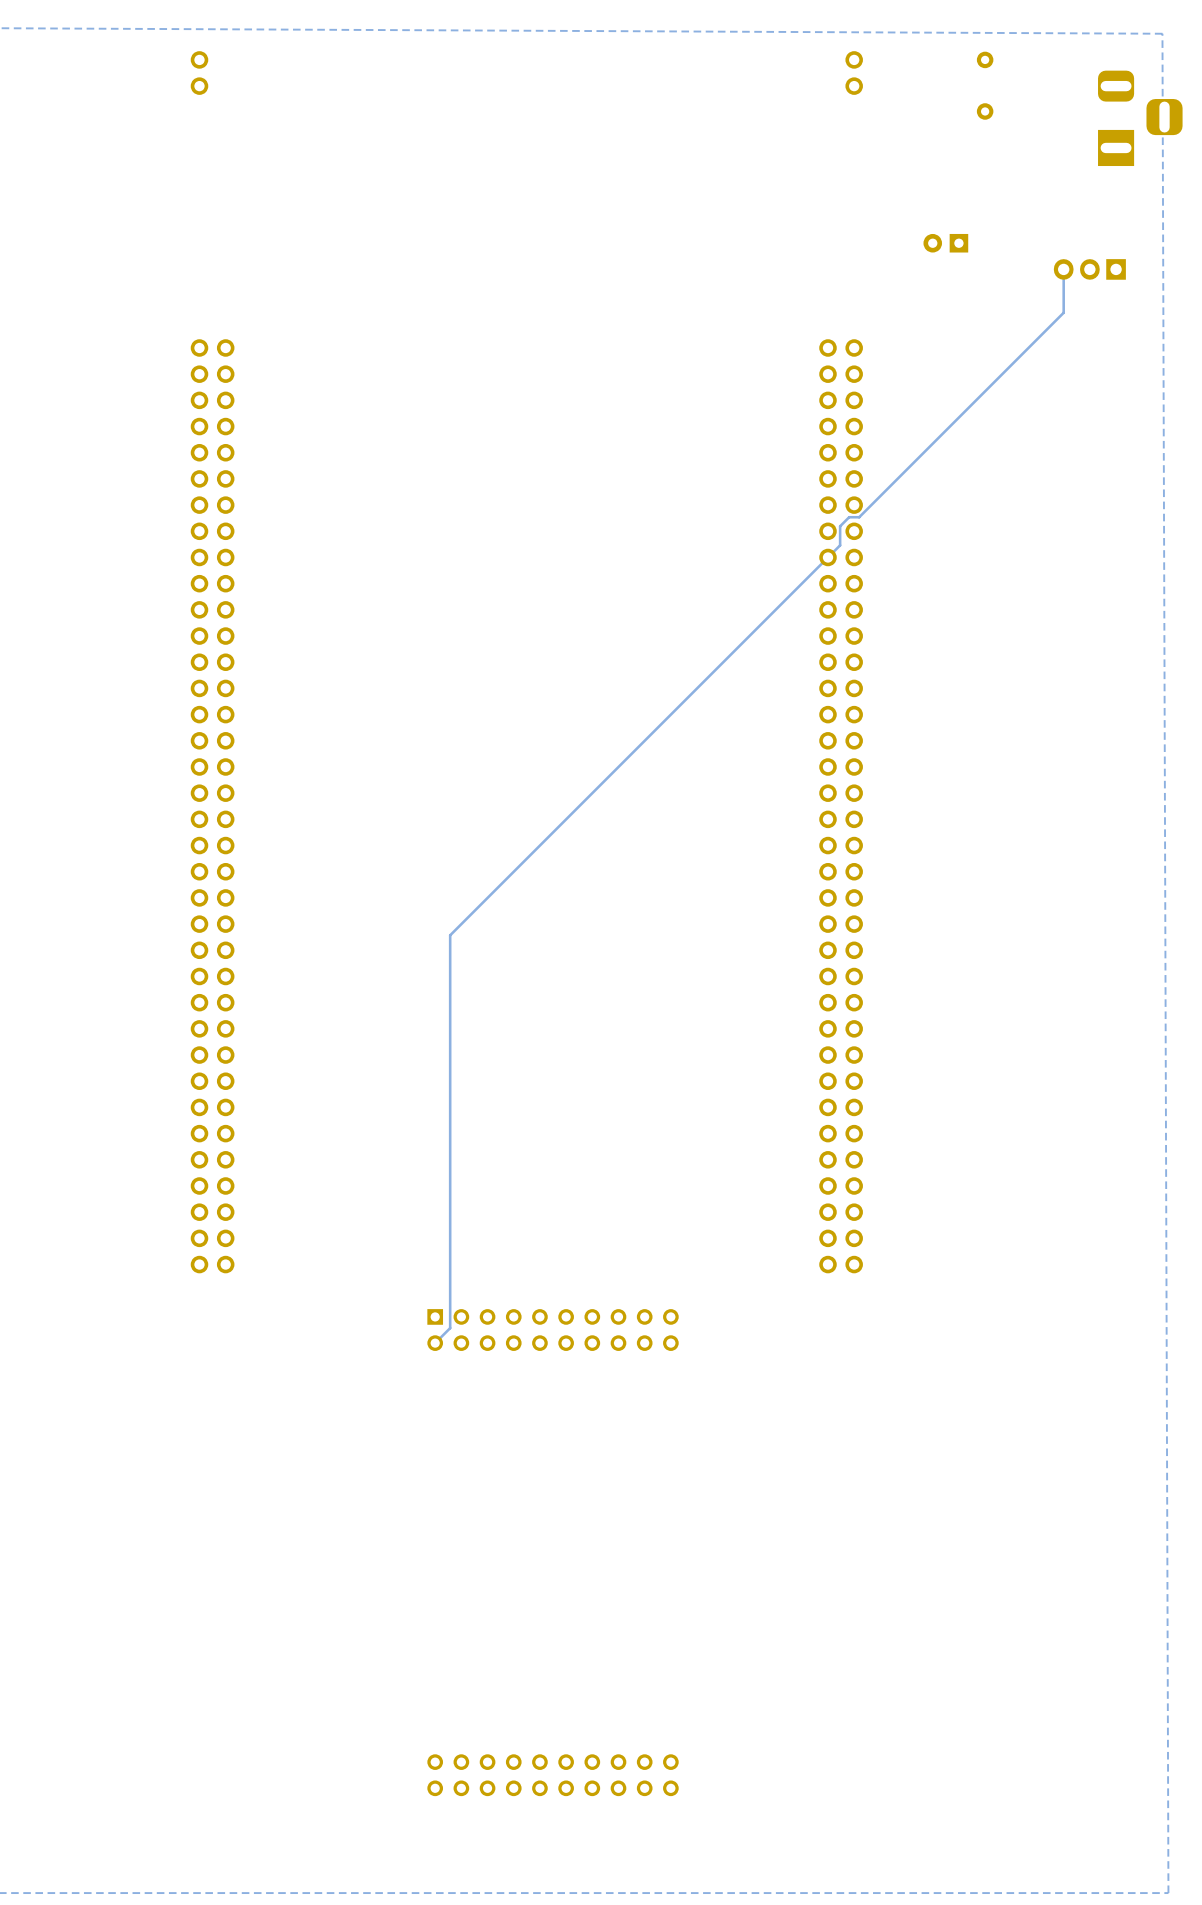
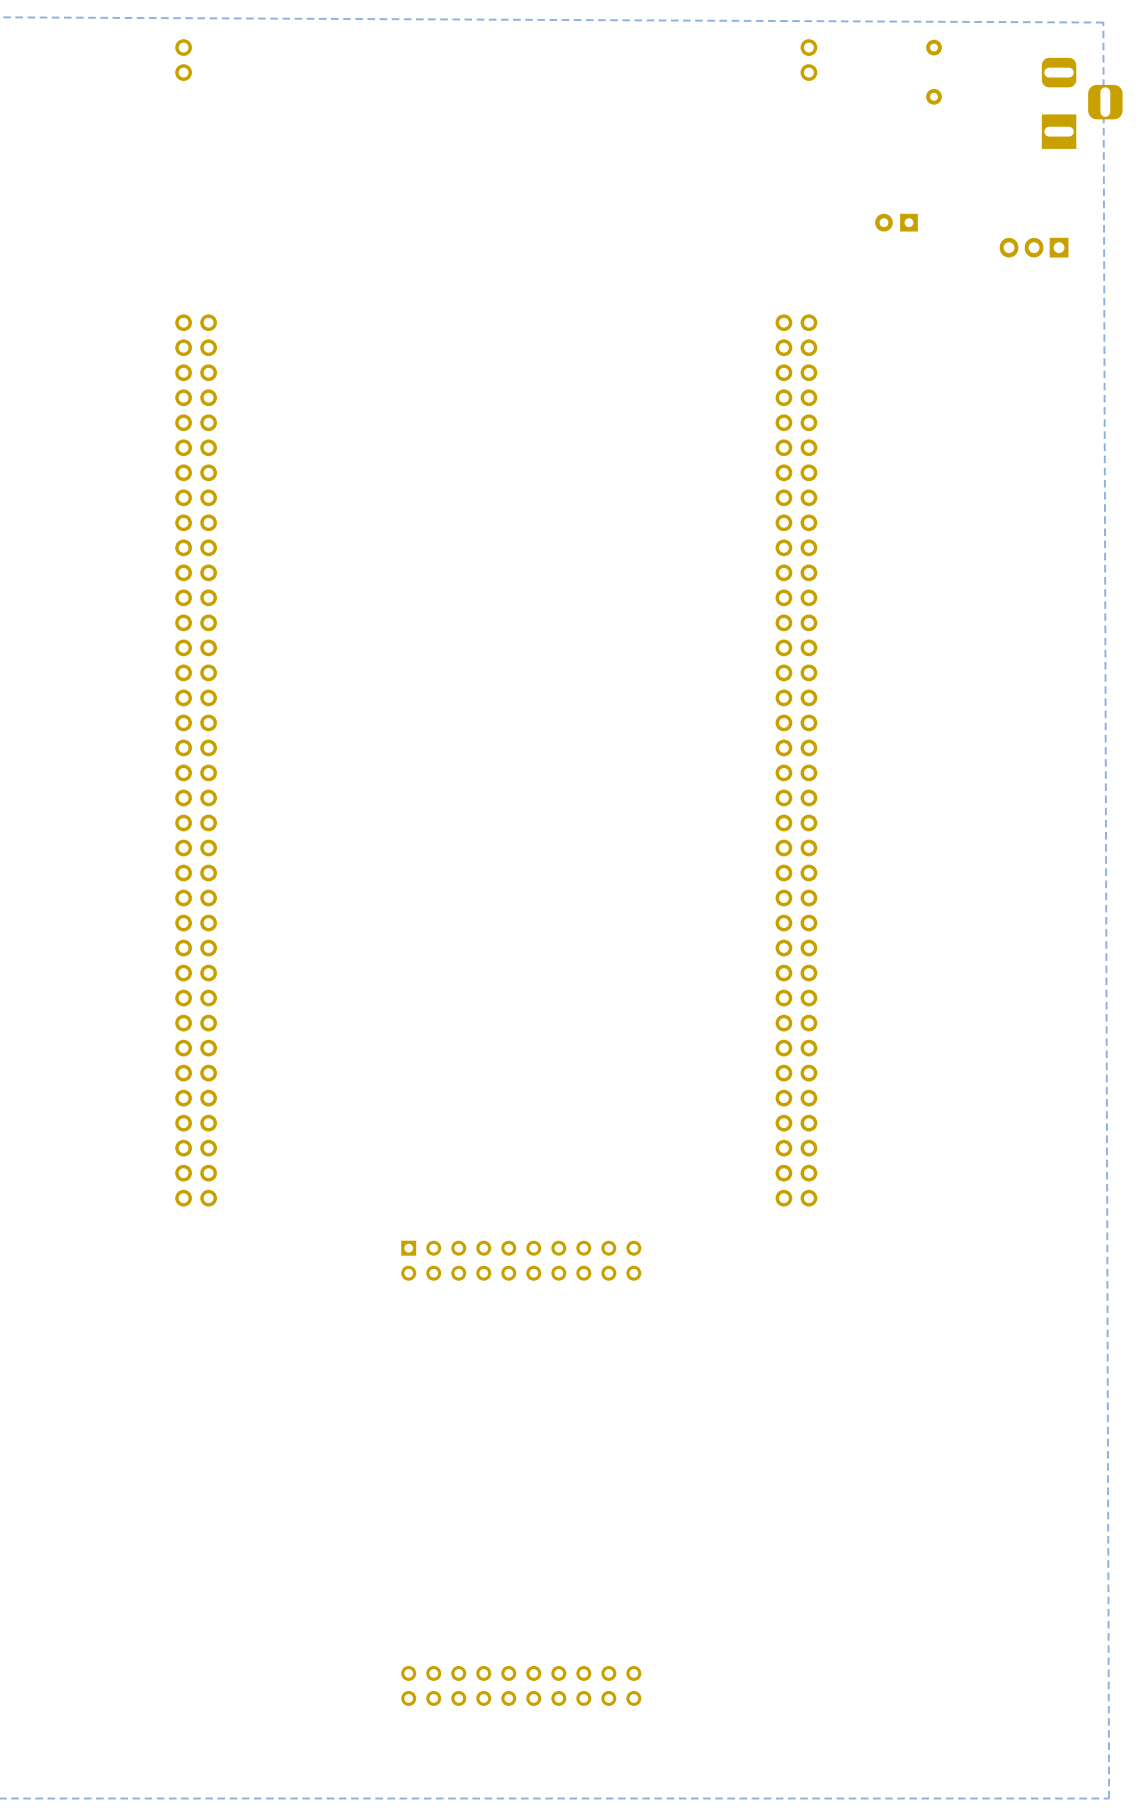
track: (1063, 269) (1063, 312) (859, 517) (849, 517) (840, 526) (840, 545) (450, 935) (450, 1328) (435, 1343) -> none

